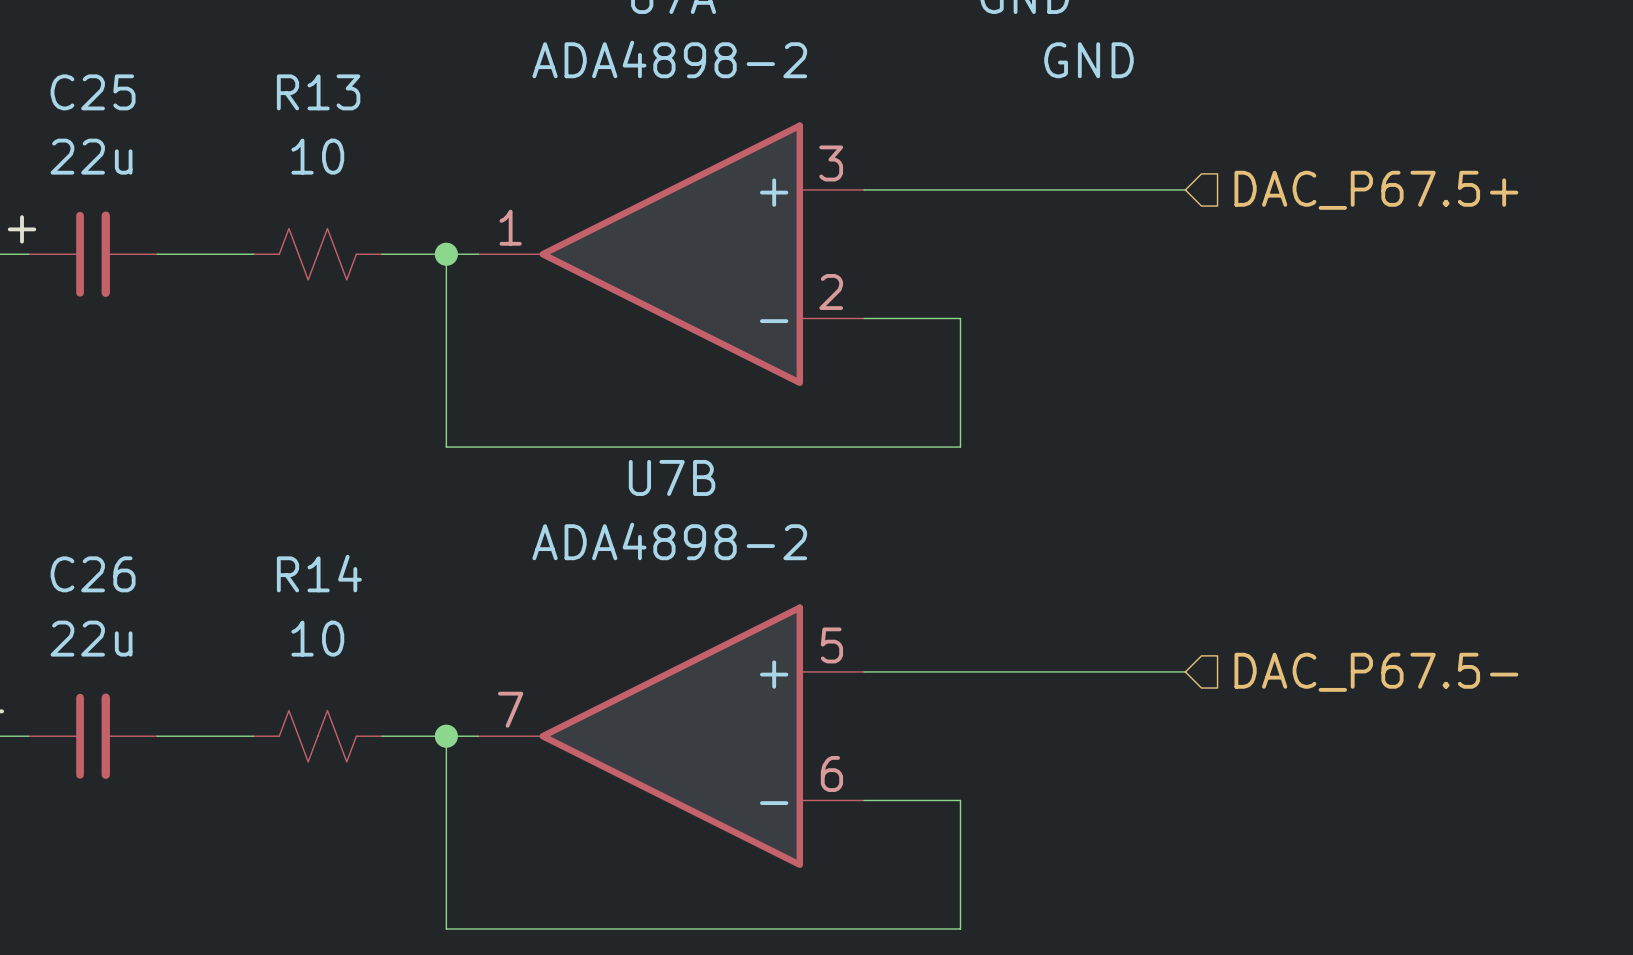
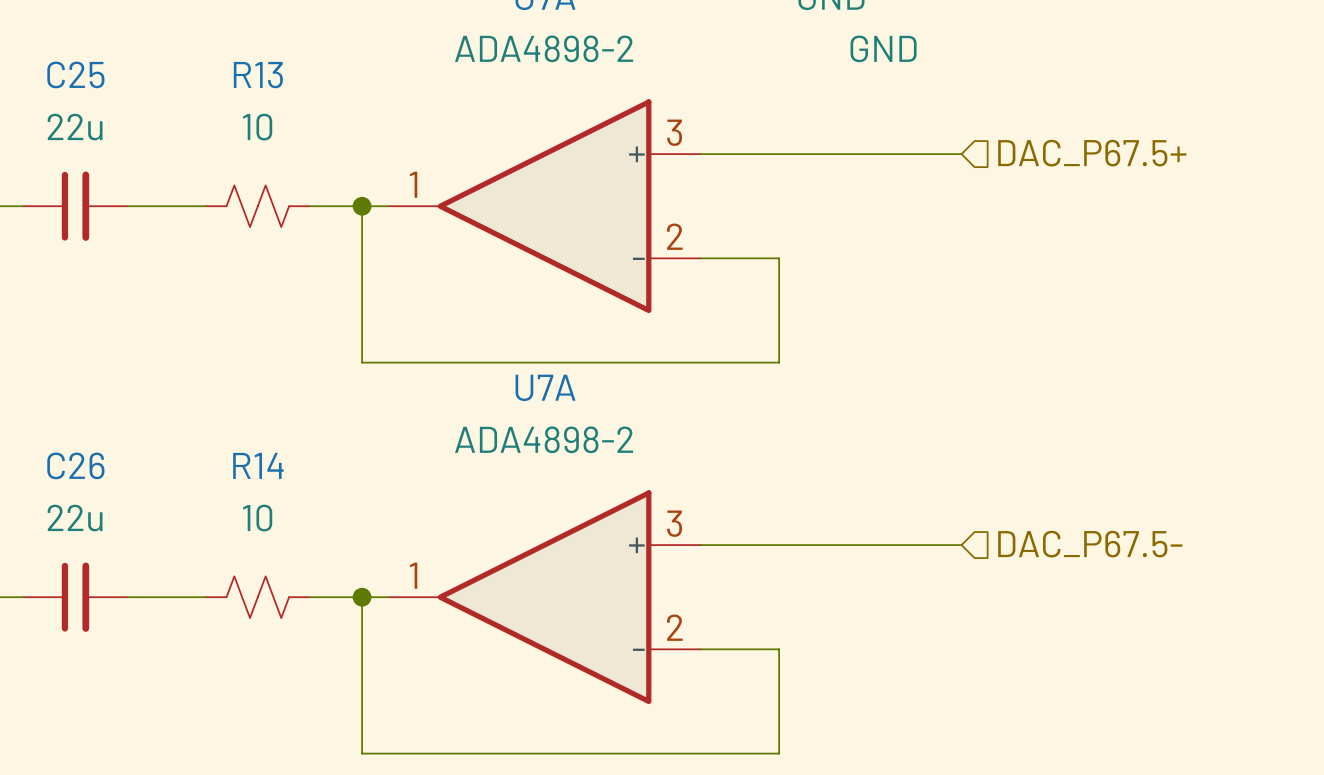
U7B name: U7B (672, 477) -> U7A (545, 387)
U7B pin number: 5 (831, 645) -> 3 (674, 523)
U7B pin number: 7 (510, 709) -> 1 (413, 575)
U7B pin number: 6 (831, 773) -> 2 (674, 627)

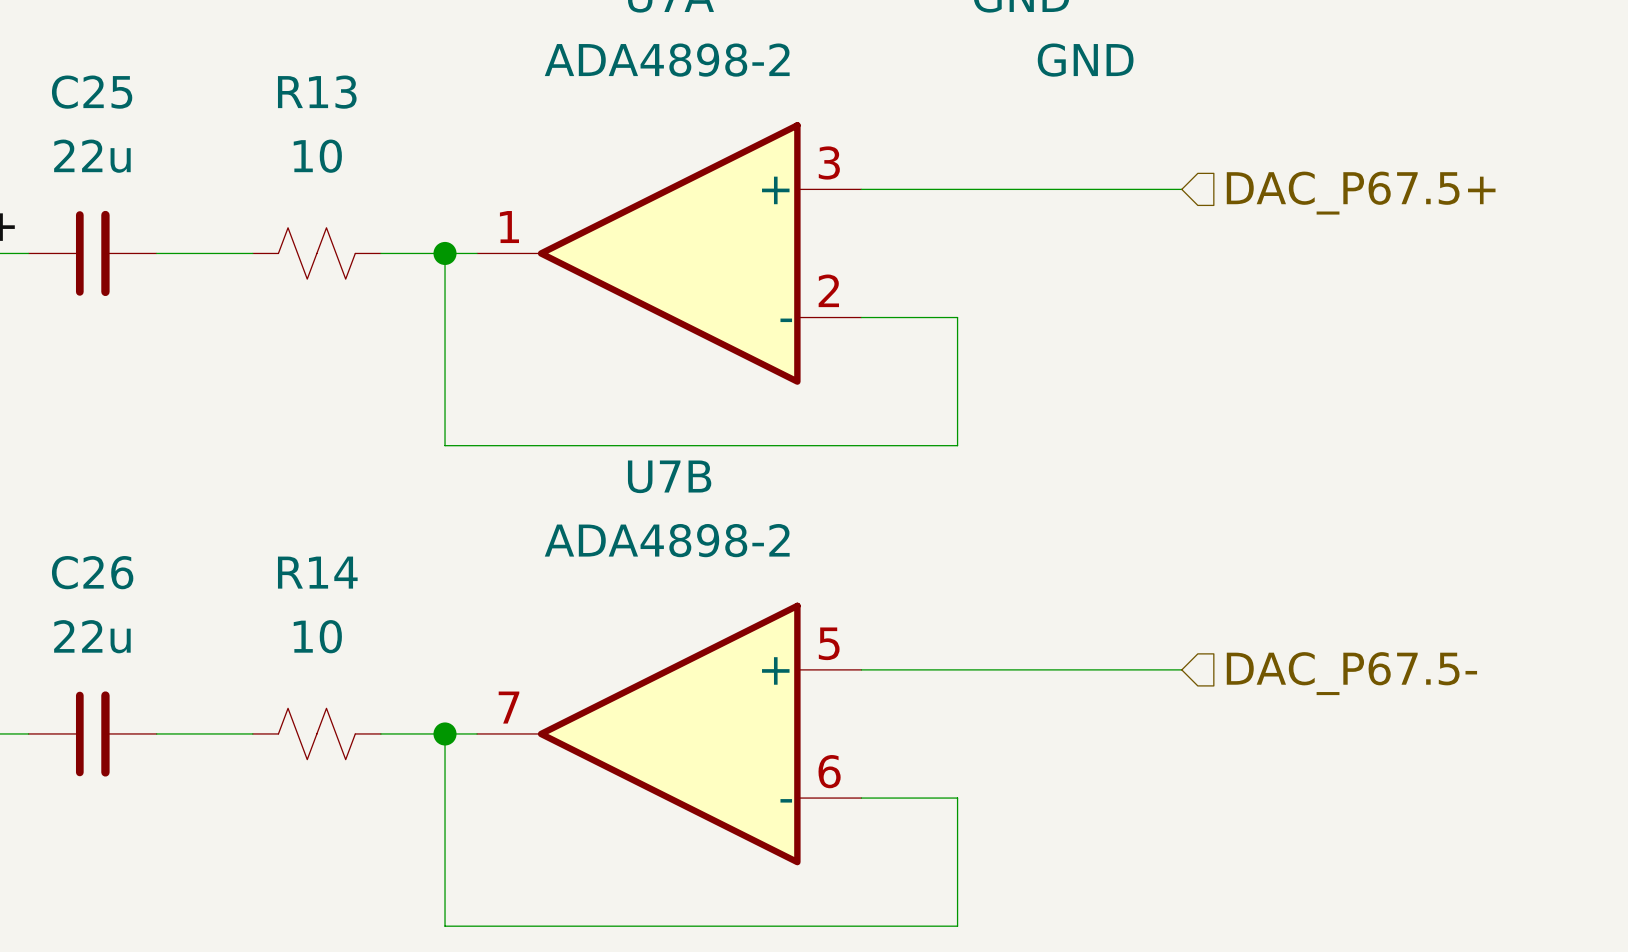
U7A name: U7A (545, 387) -> U7B (669, 476)
U7A pin number: 3 (674, 523) -> 5 (829, 643)
U7A pin number: 1 (413, 575) -> 7 (509, 707)
U7A pin number: 2 (674, 627) -> 6 (829, 771)

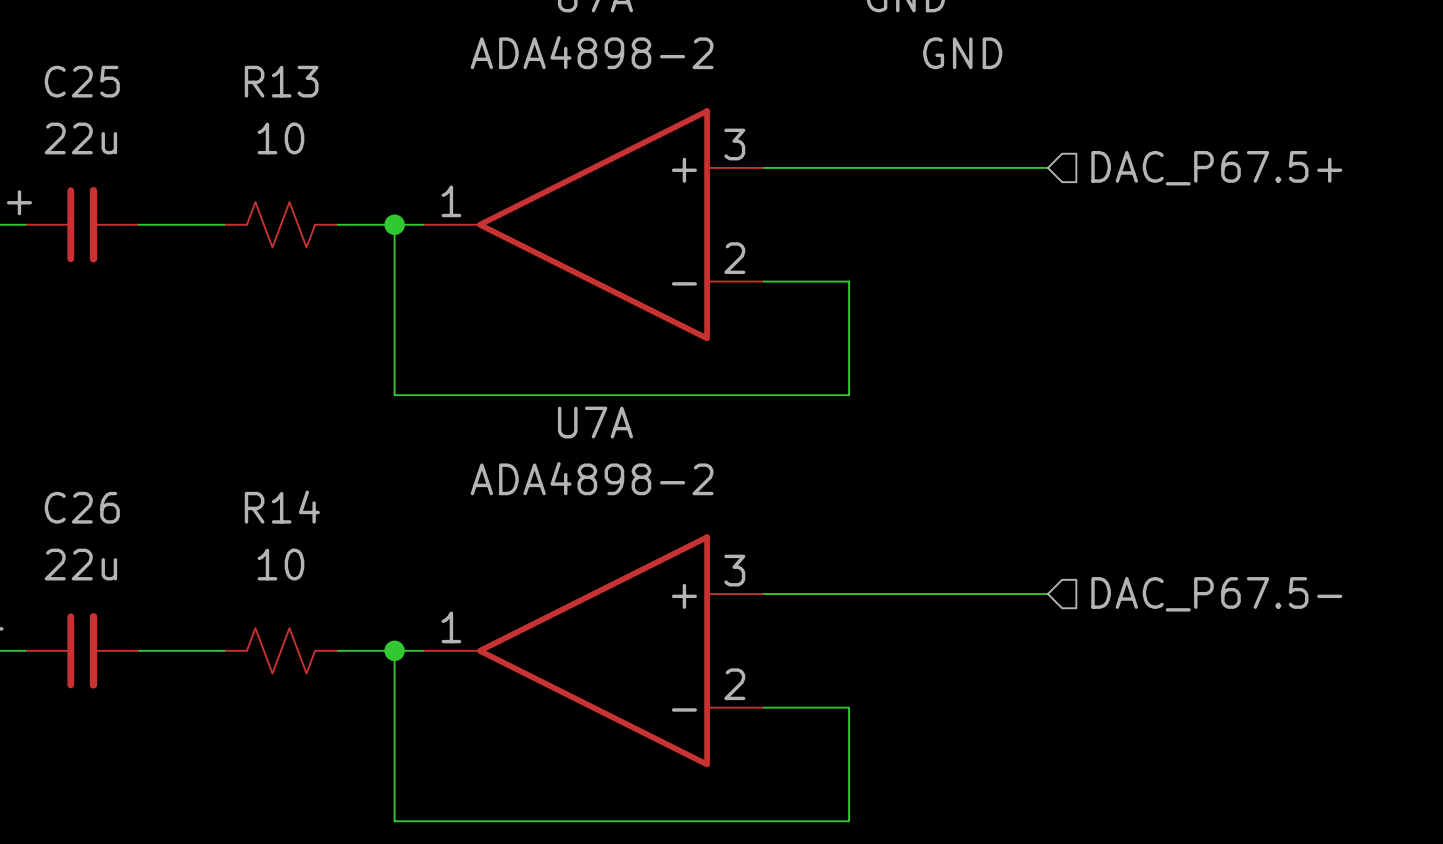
U7B name: U7B (669, 476) -> U7A (595, 422)
U7B pin number: 5 (829, 643) -> 3 (734, 570)
U7B pin number: 7 (509, 707) -> 1 (451, 627)
U7B pin number: 6 (829, 771) -> 2 (734, 684)

